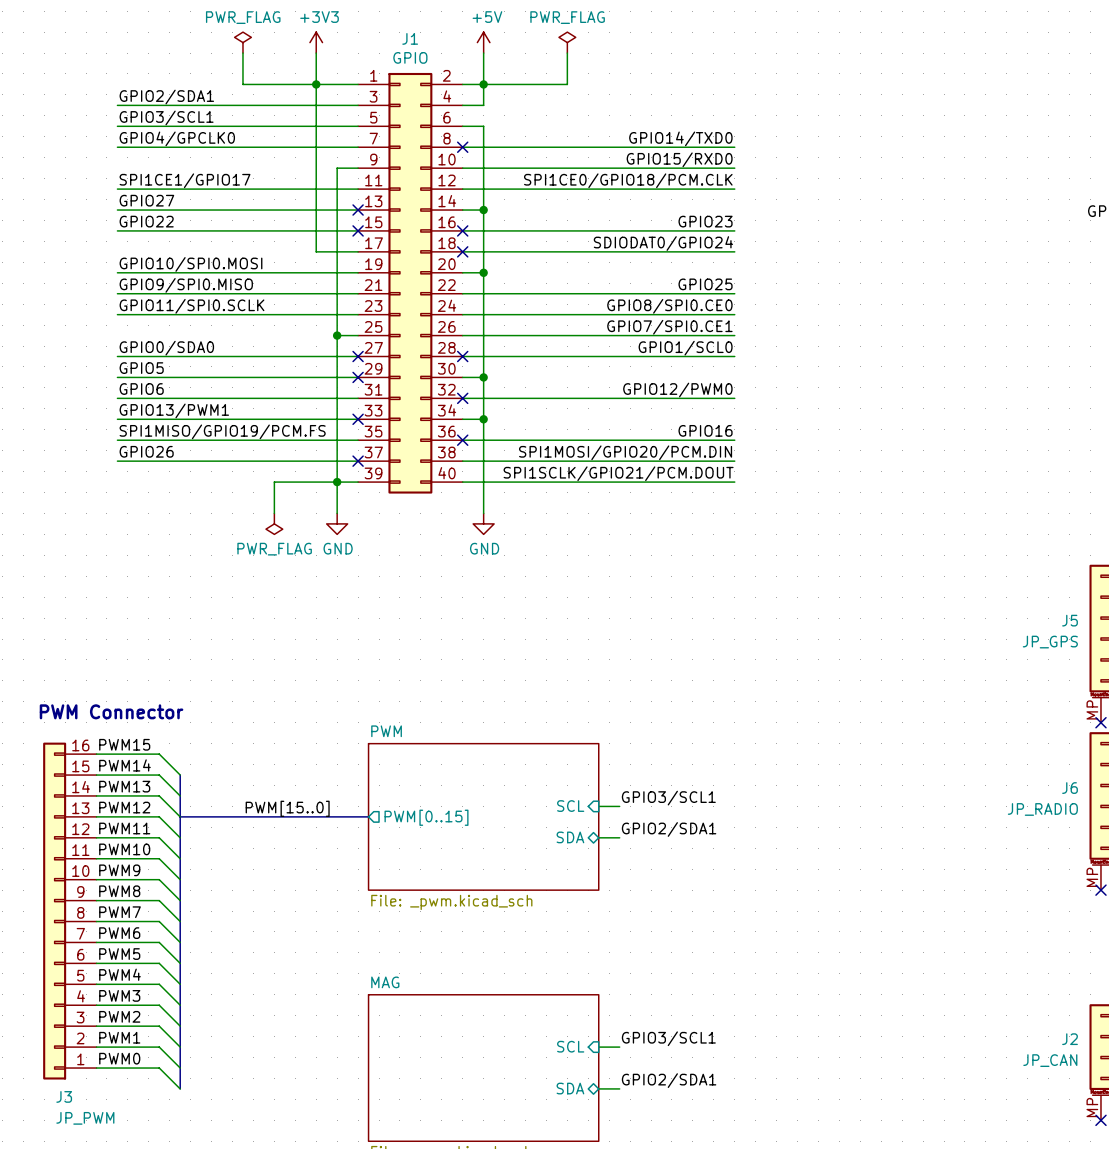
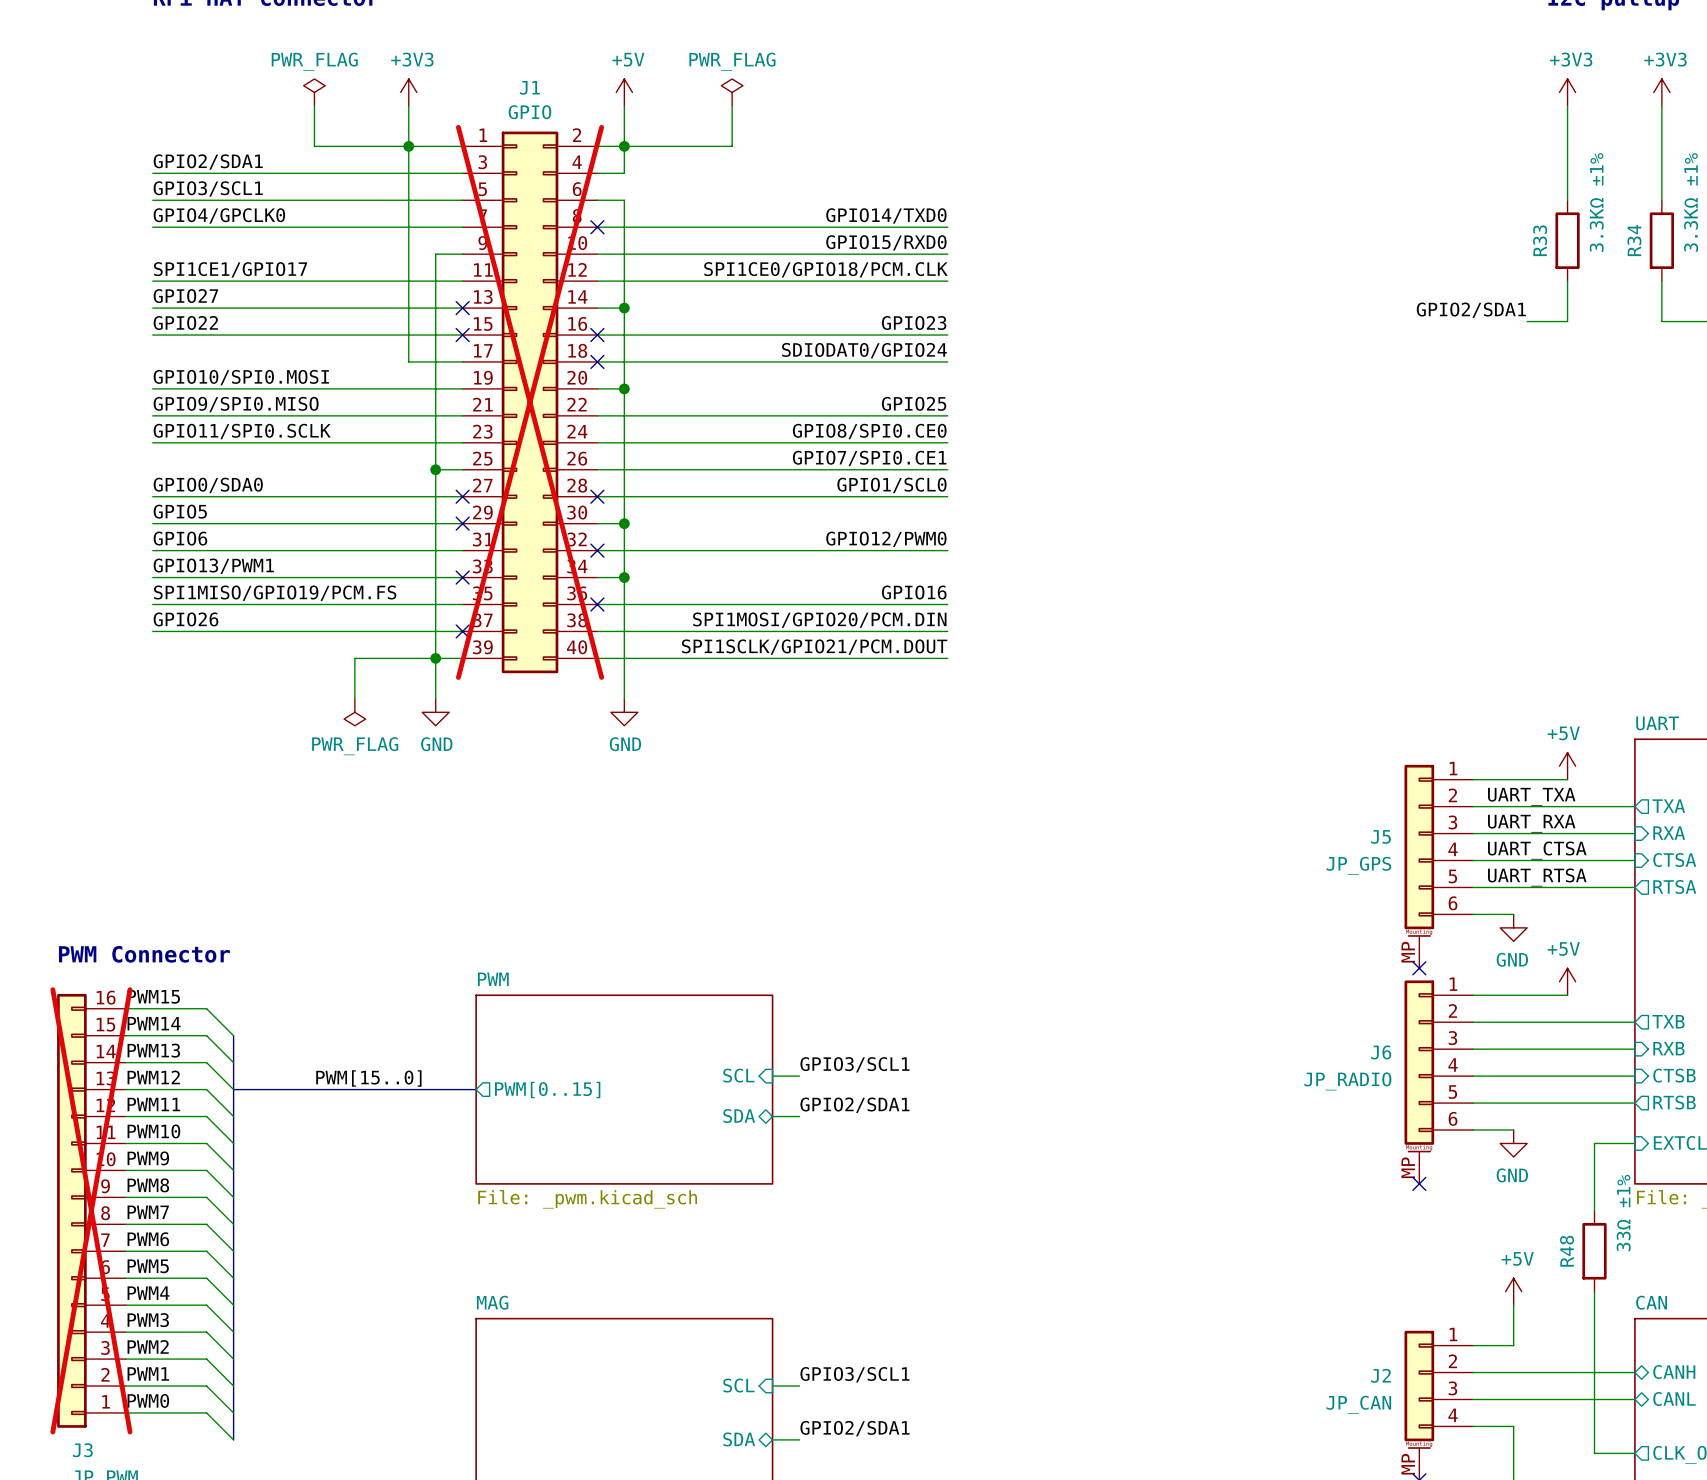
J1 do-not-place cross: none -> (530, 402)
J3 do-not-place cross: none -> (91, 1210)

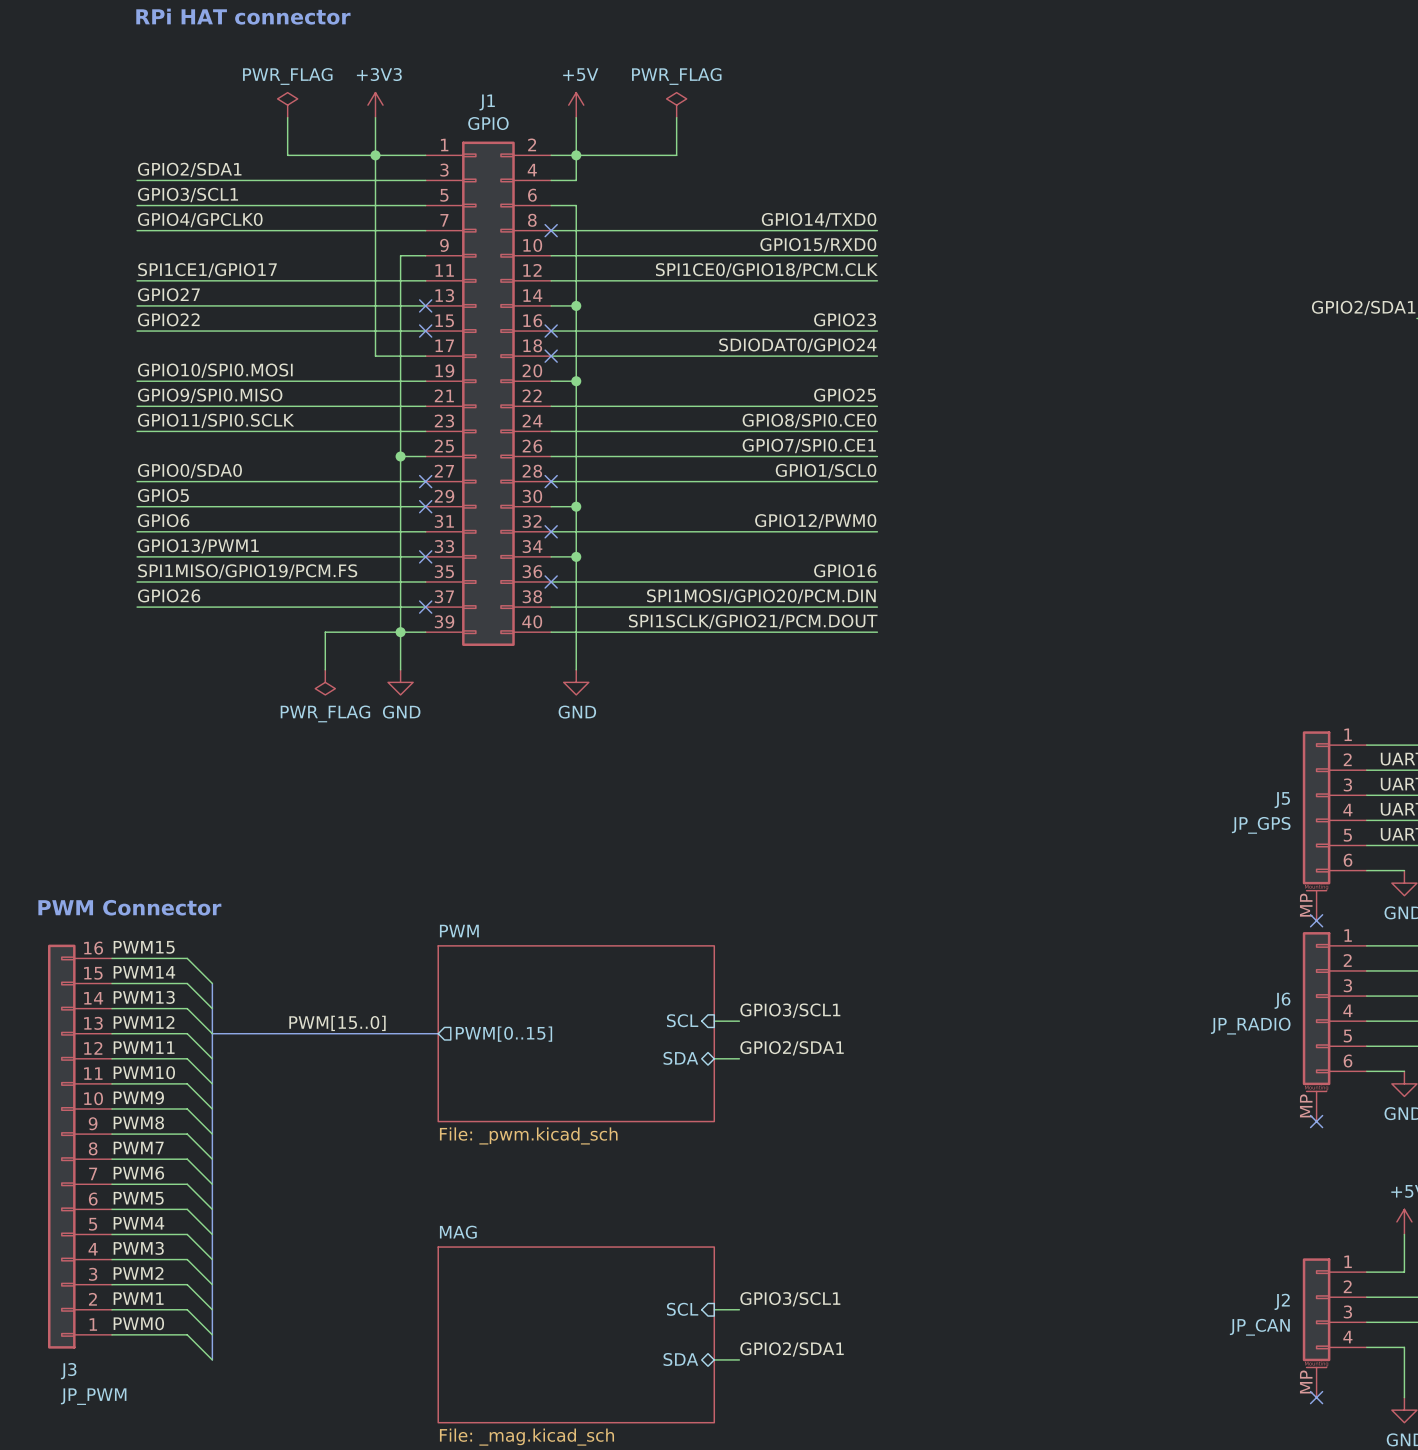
J1 do-not-place cross: (530, 402) -> none
J3 do-not-place cross: (91, 1210) -> none

